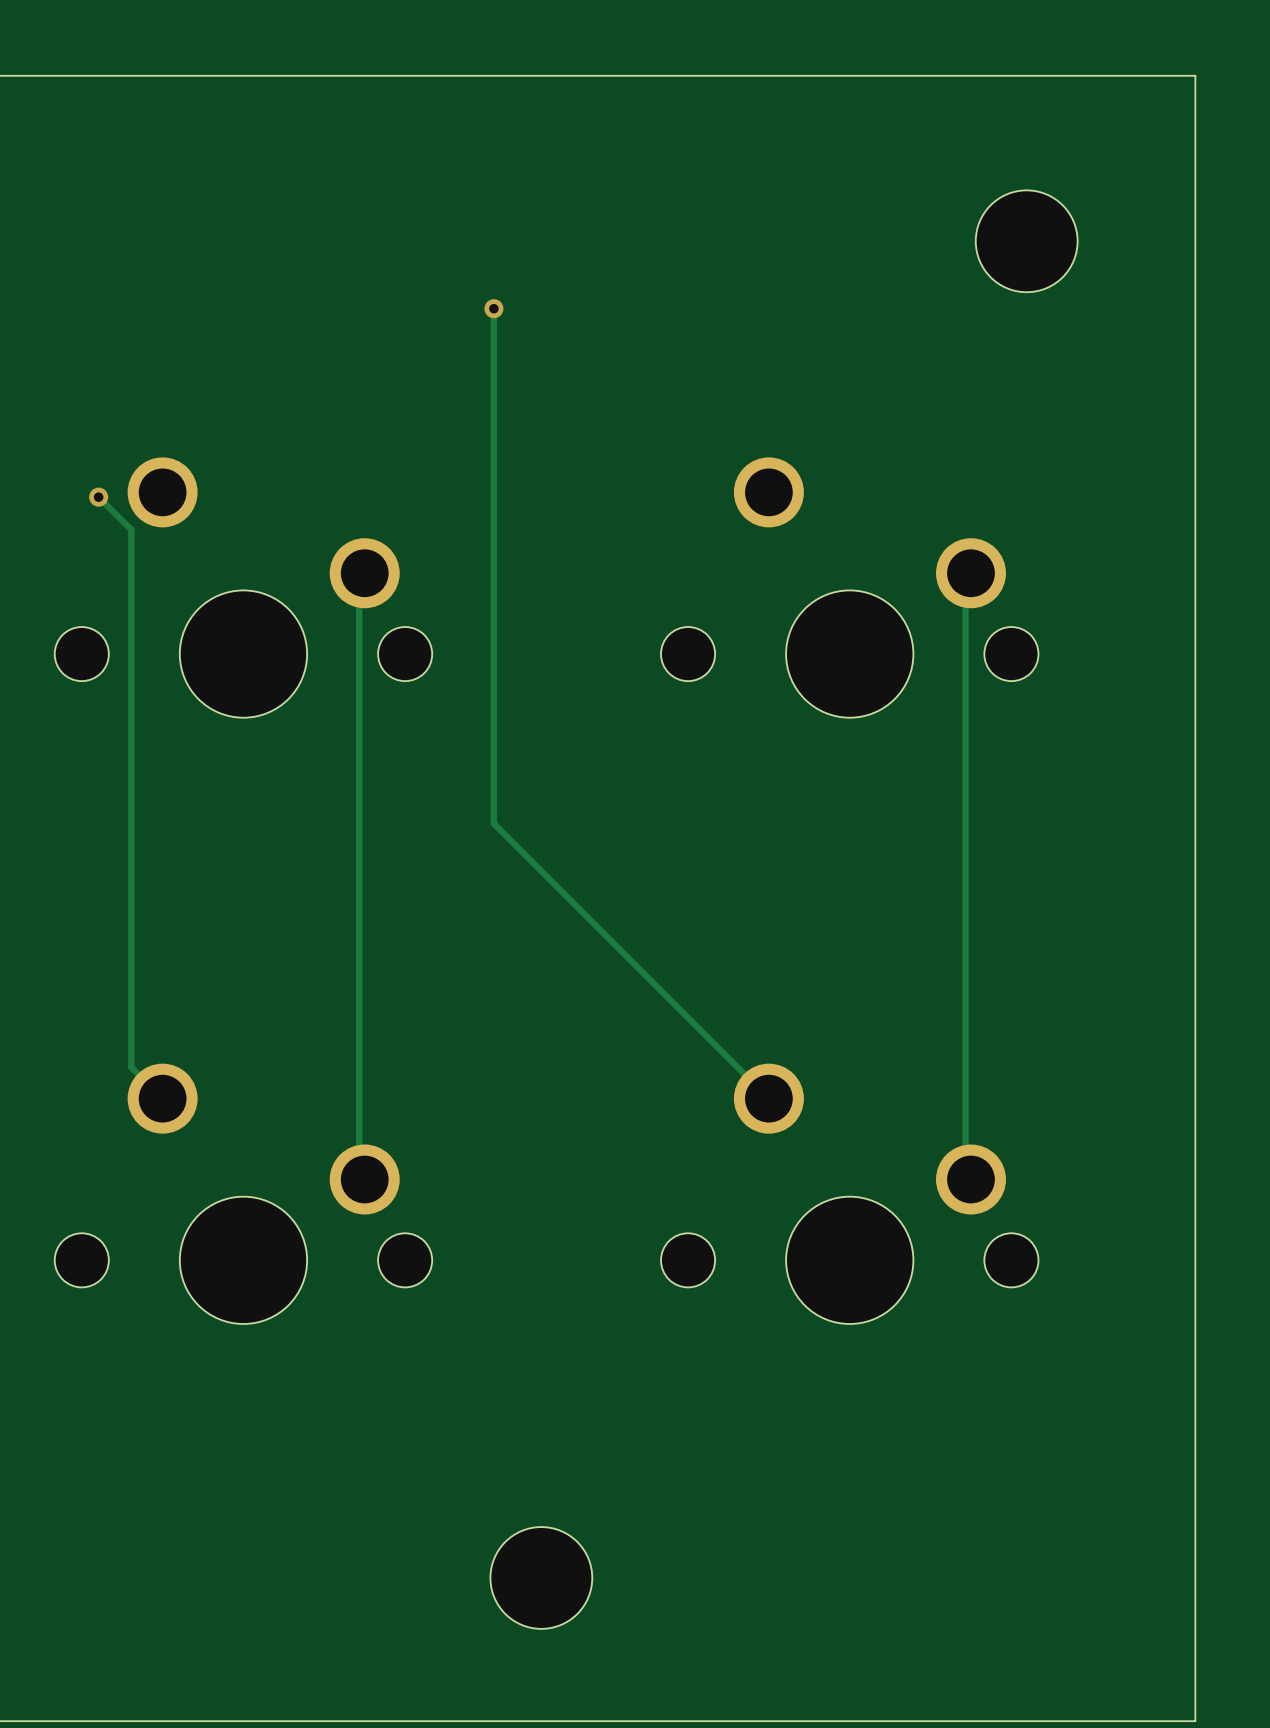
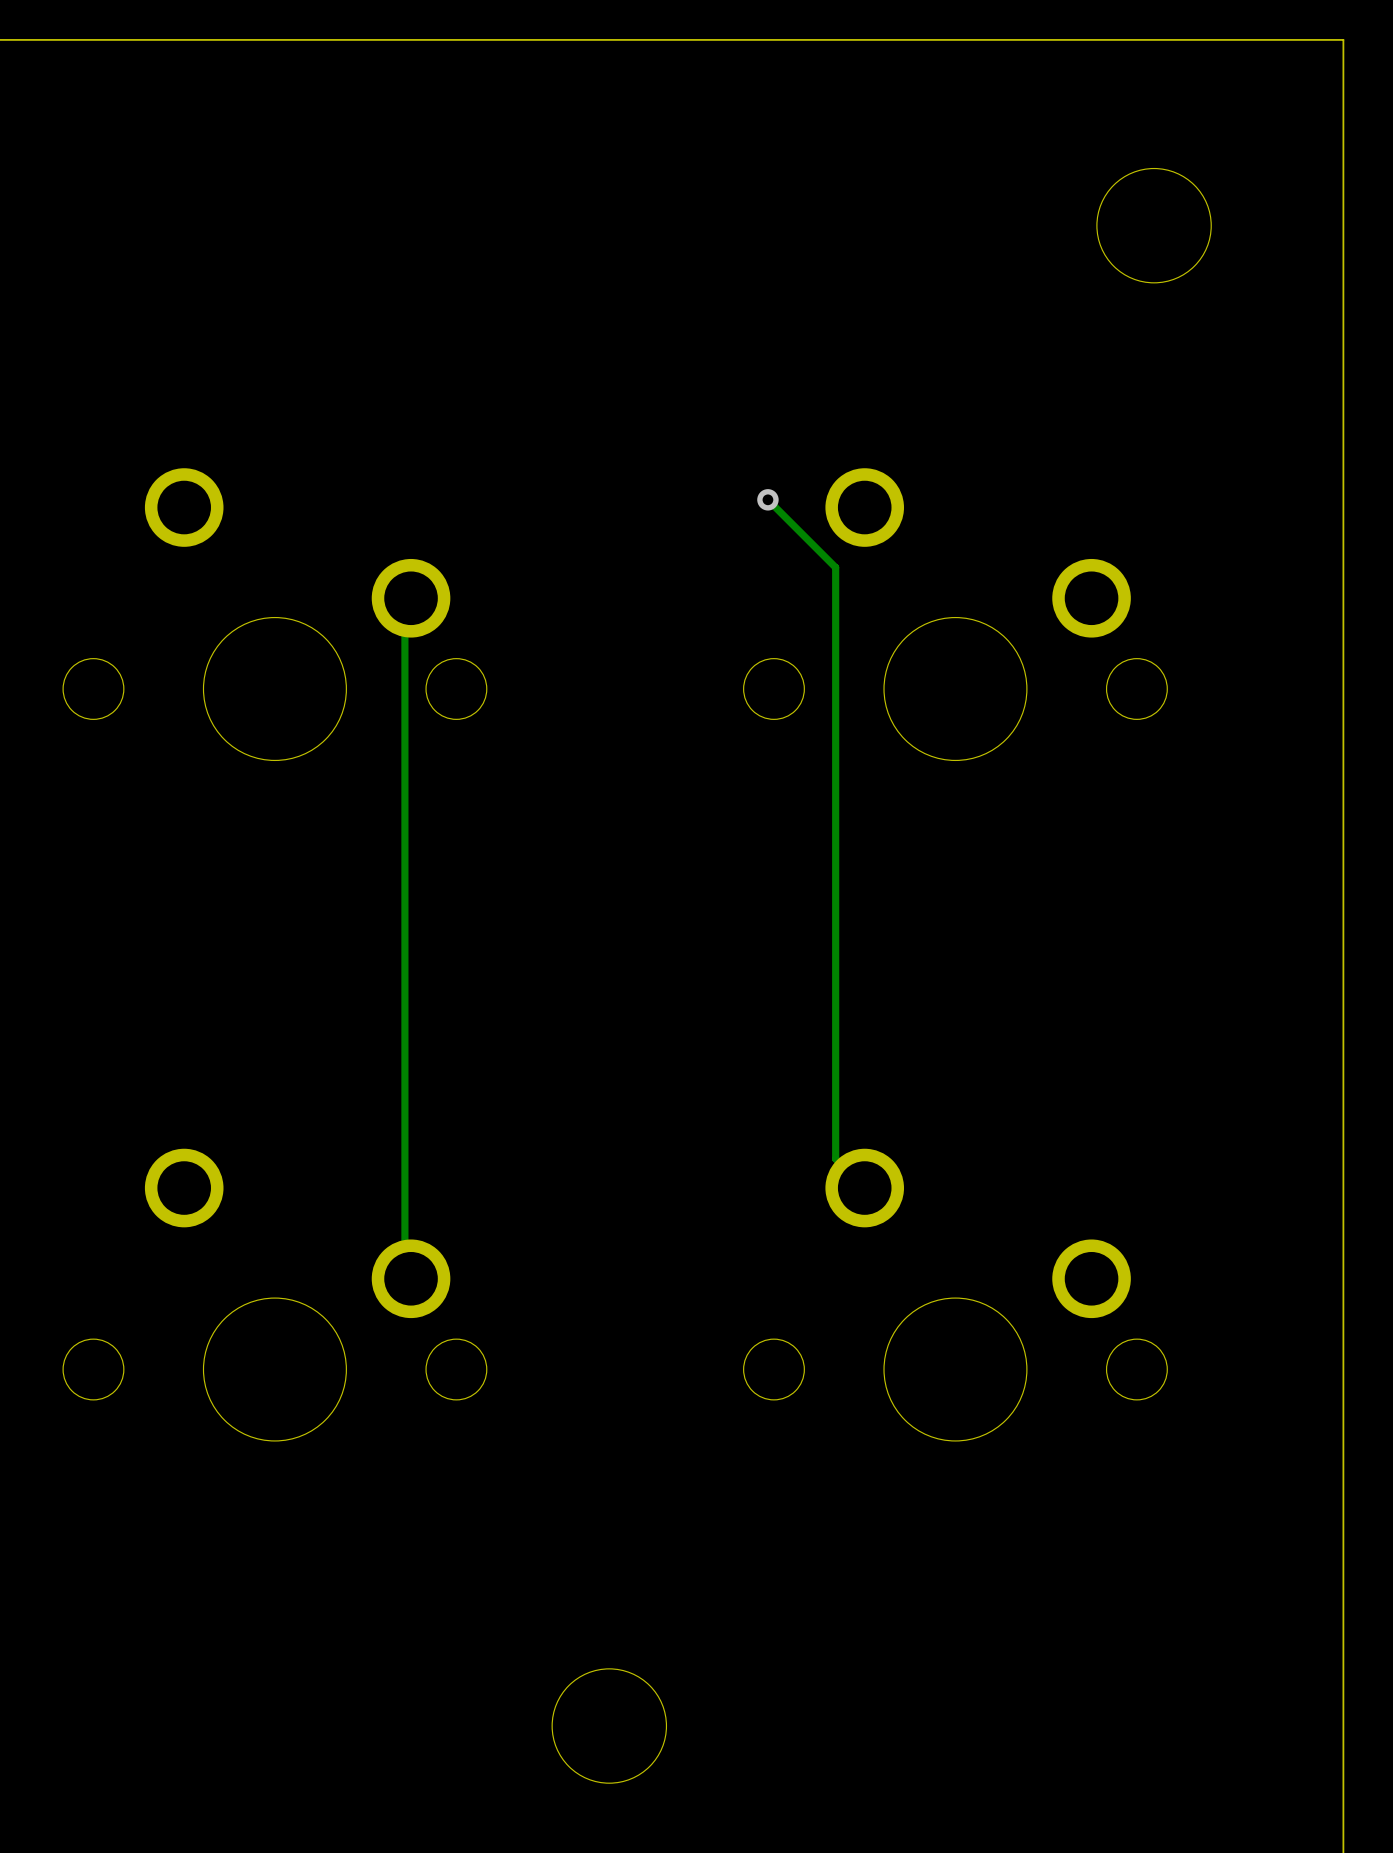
track: (493, 308) (493, 823) (743, 1072) -> (767, 499) (835, 567) (835, 1158)
via: (493, 308) -> none
via: none -> (767, 499)
track: (98, 497) (131, 529) (131, 1067) (162, 1098) -> none
via: (98, 497) -> none
track: (970, 573) (965, 578) (965, 1174) (970, 1179) -> none

